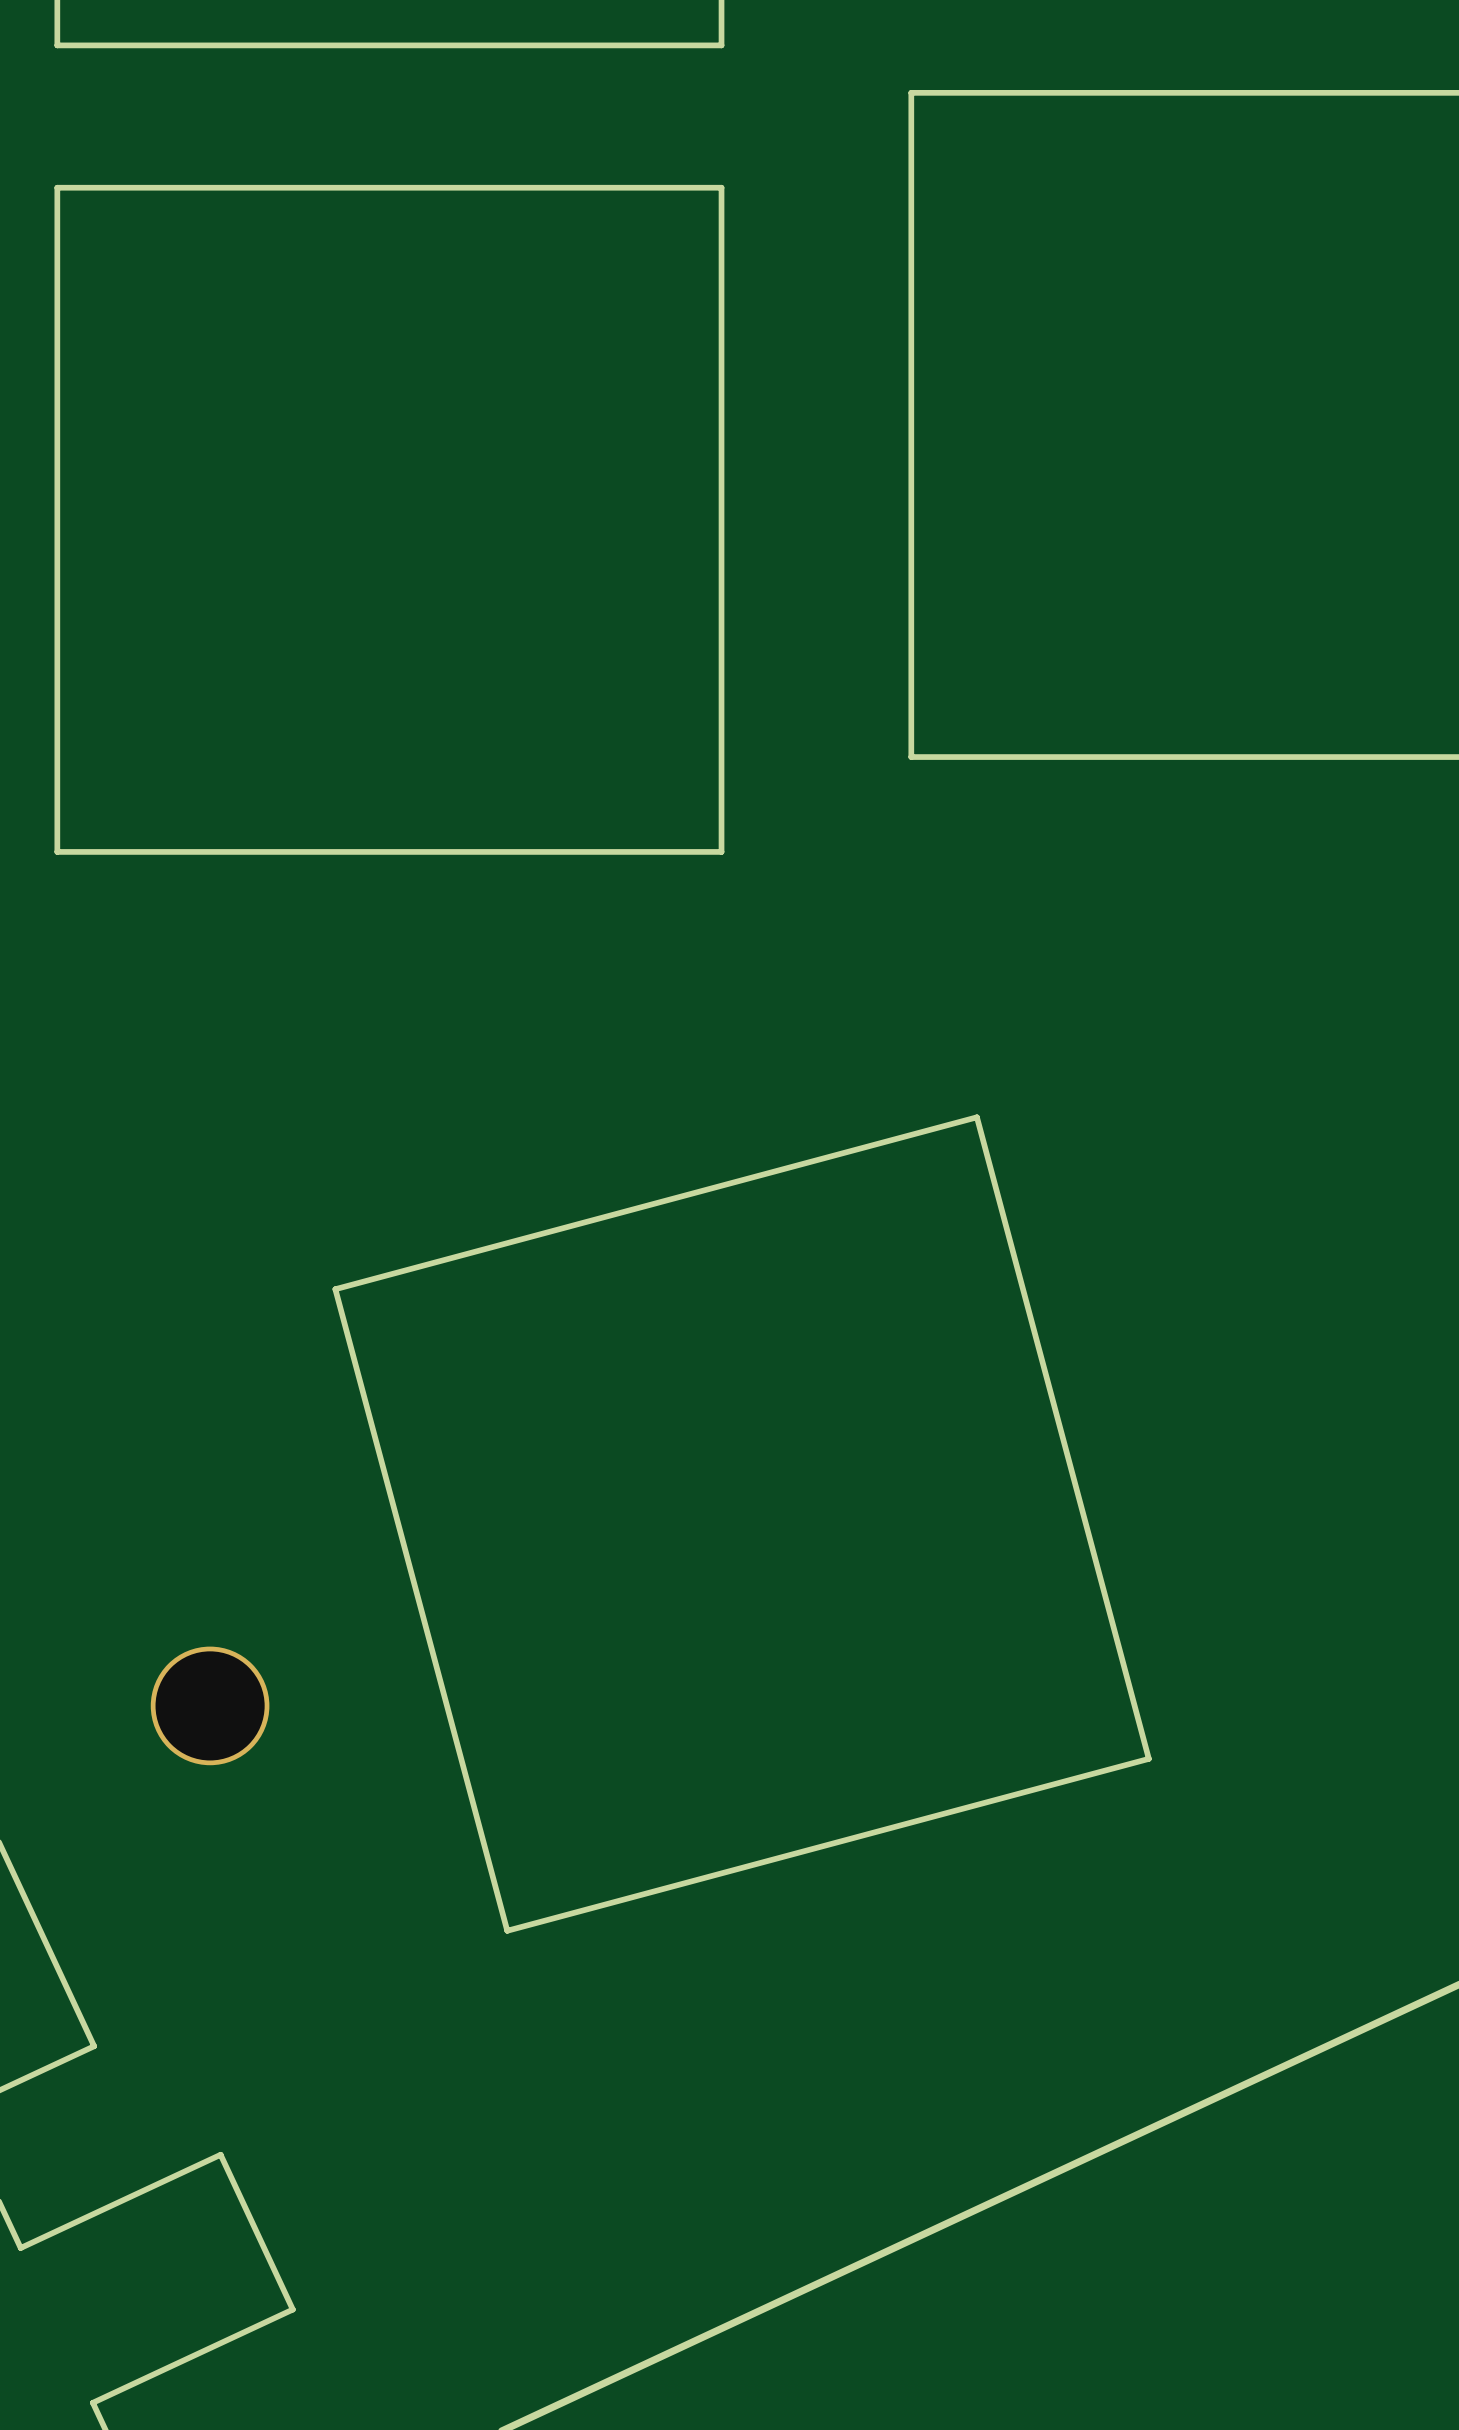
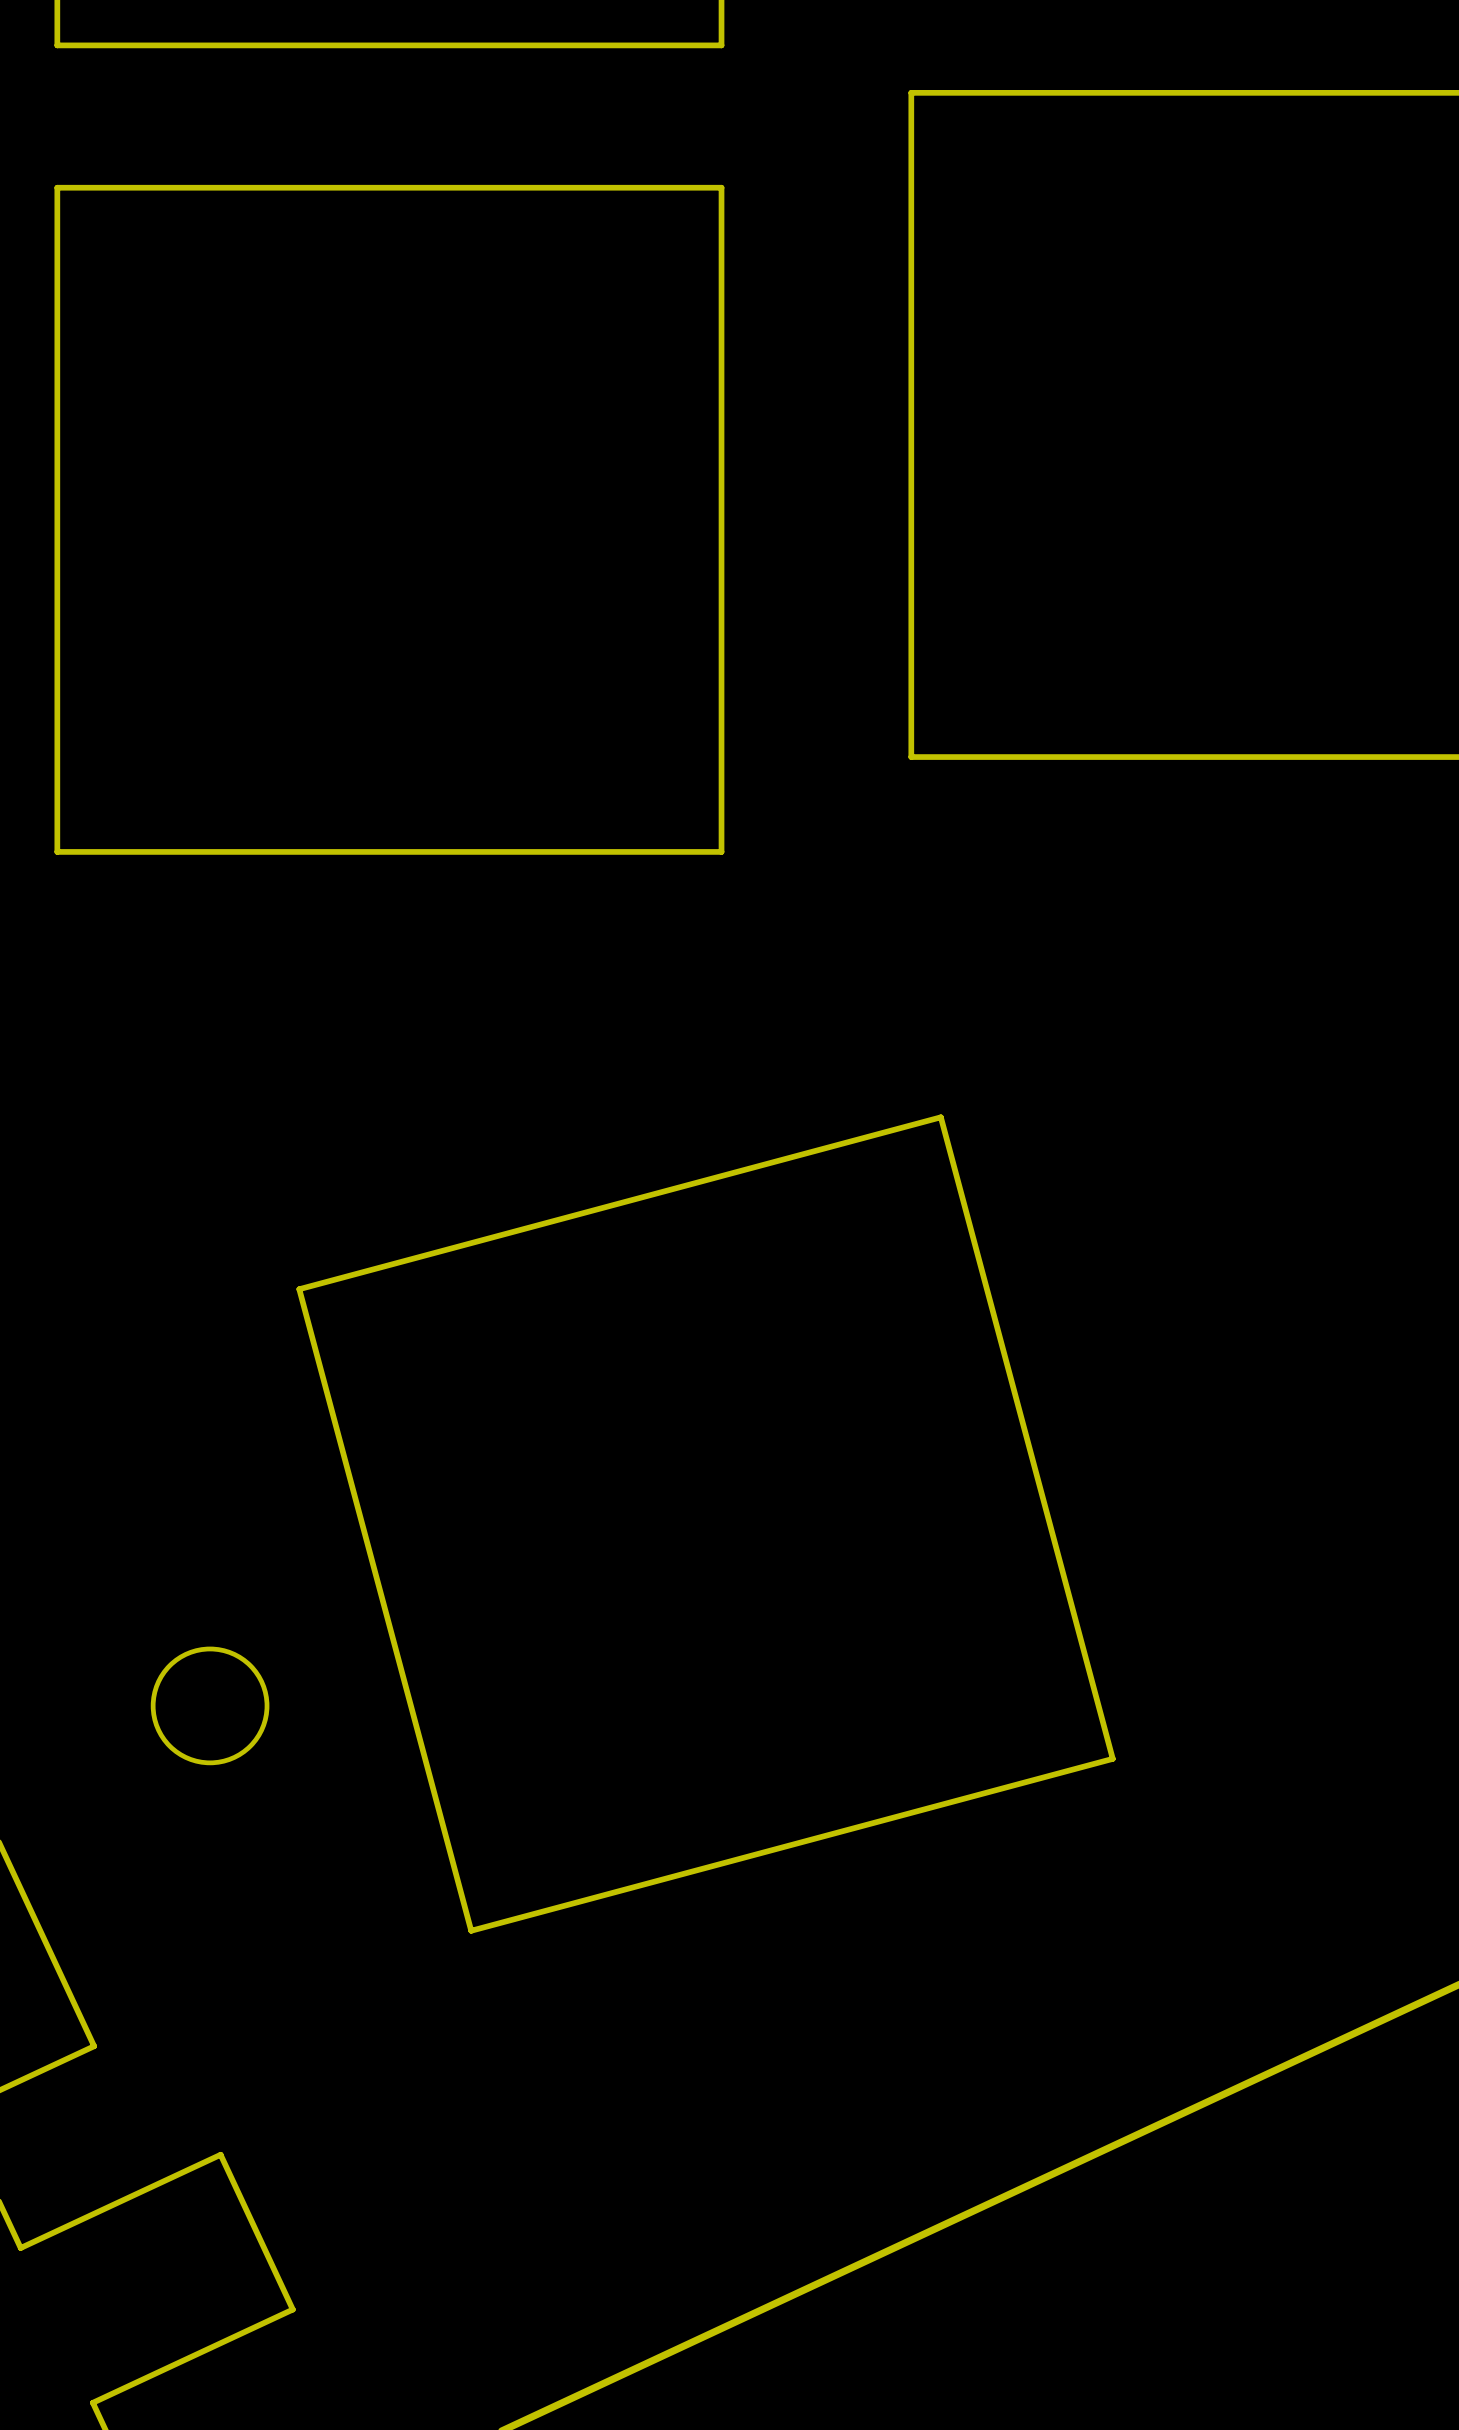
drawing position: (742, 1524) -> (706, 1524)

